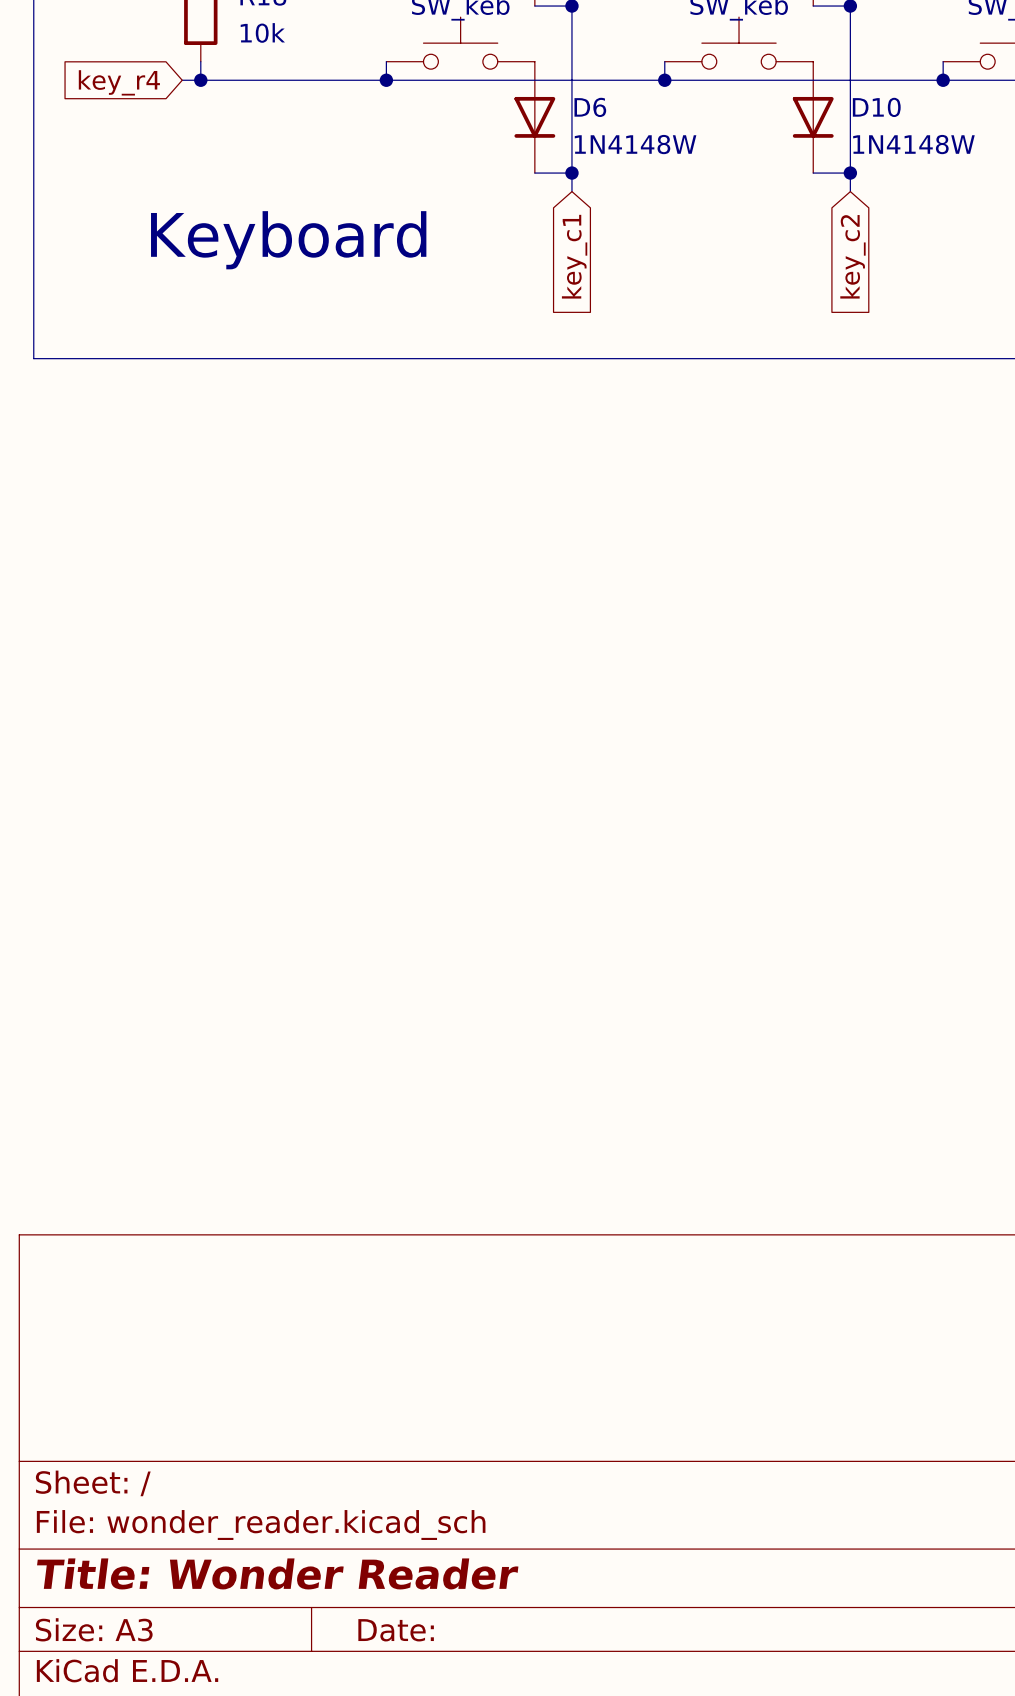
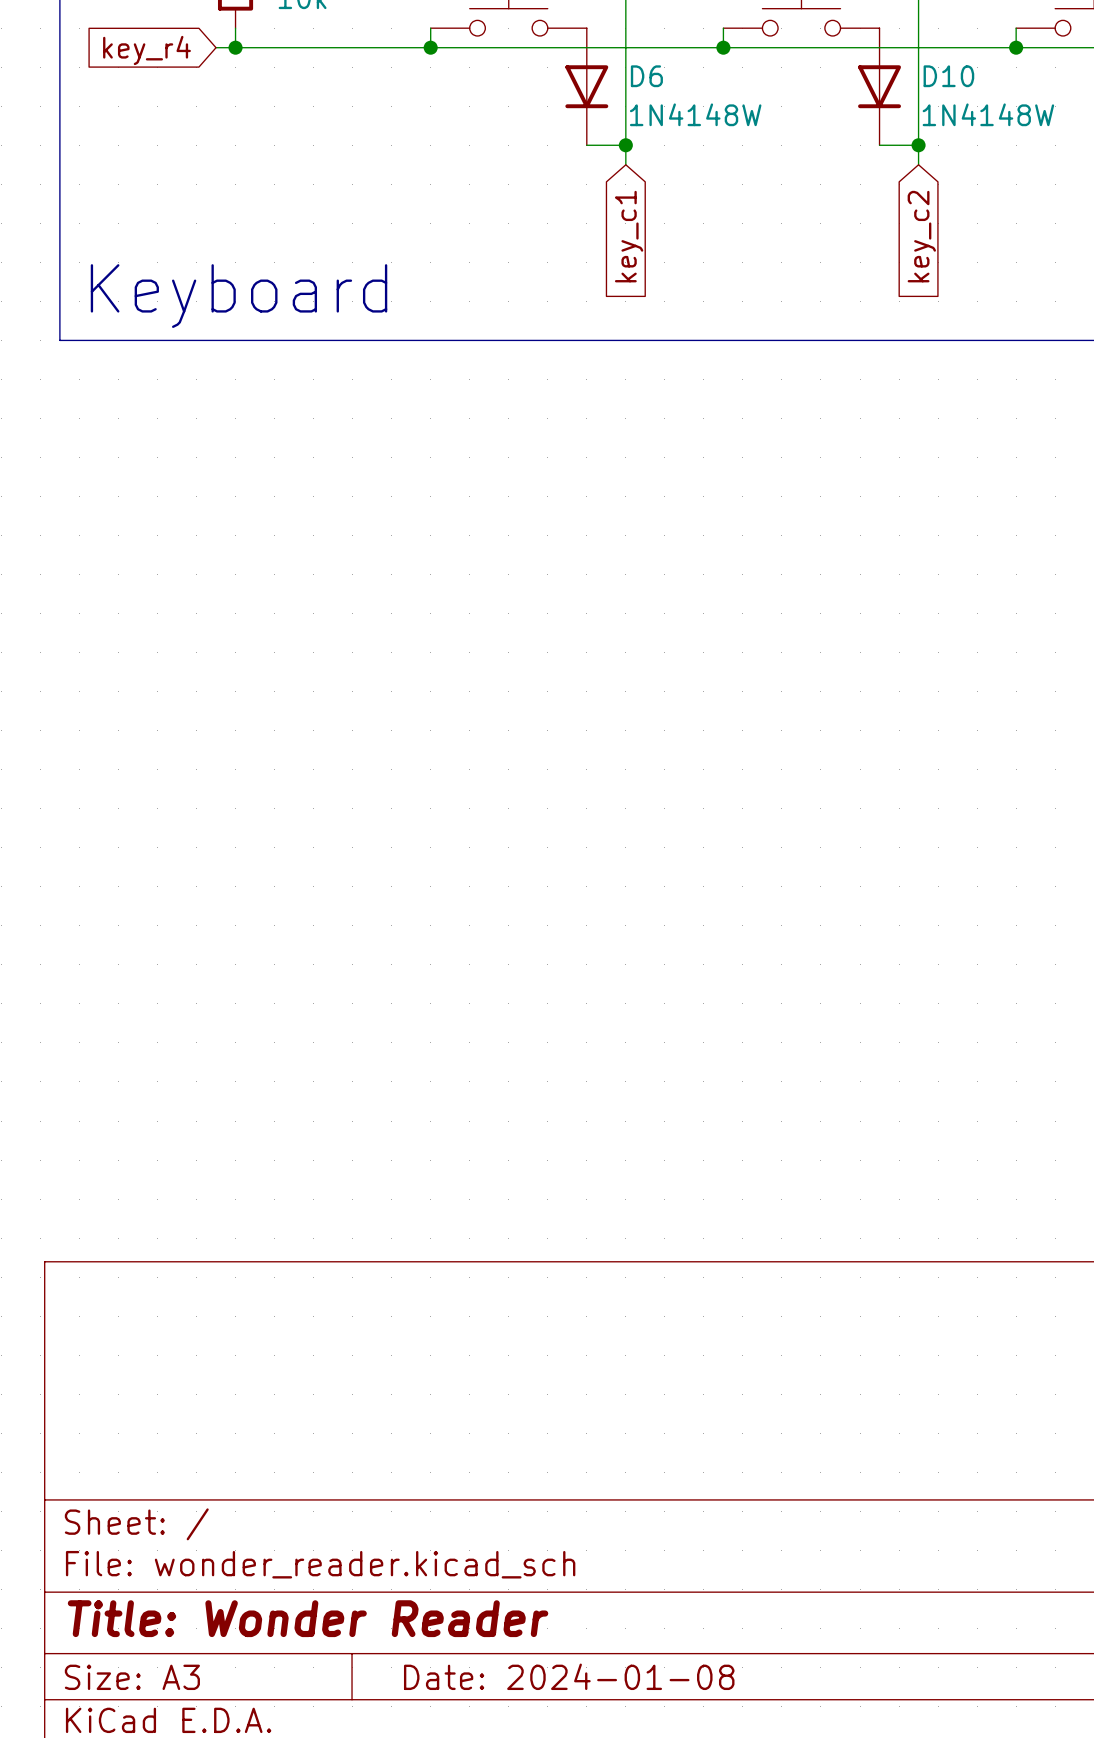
text position: Keyboard (288, 240) -> Keyboard (239, 296)
title block: Date: (396, 1630) -> Date: 2024-01-08 (569, 1676)

